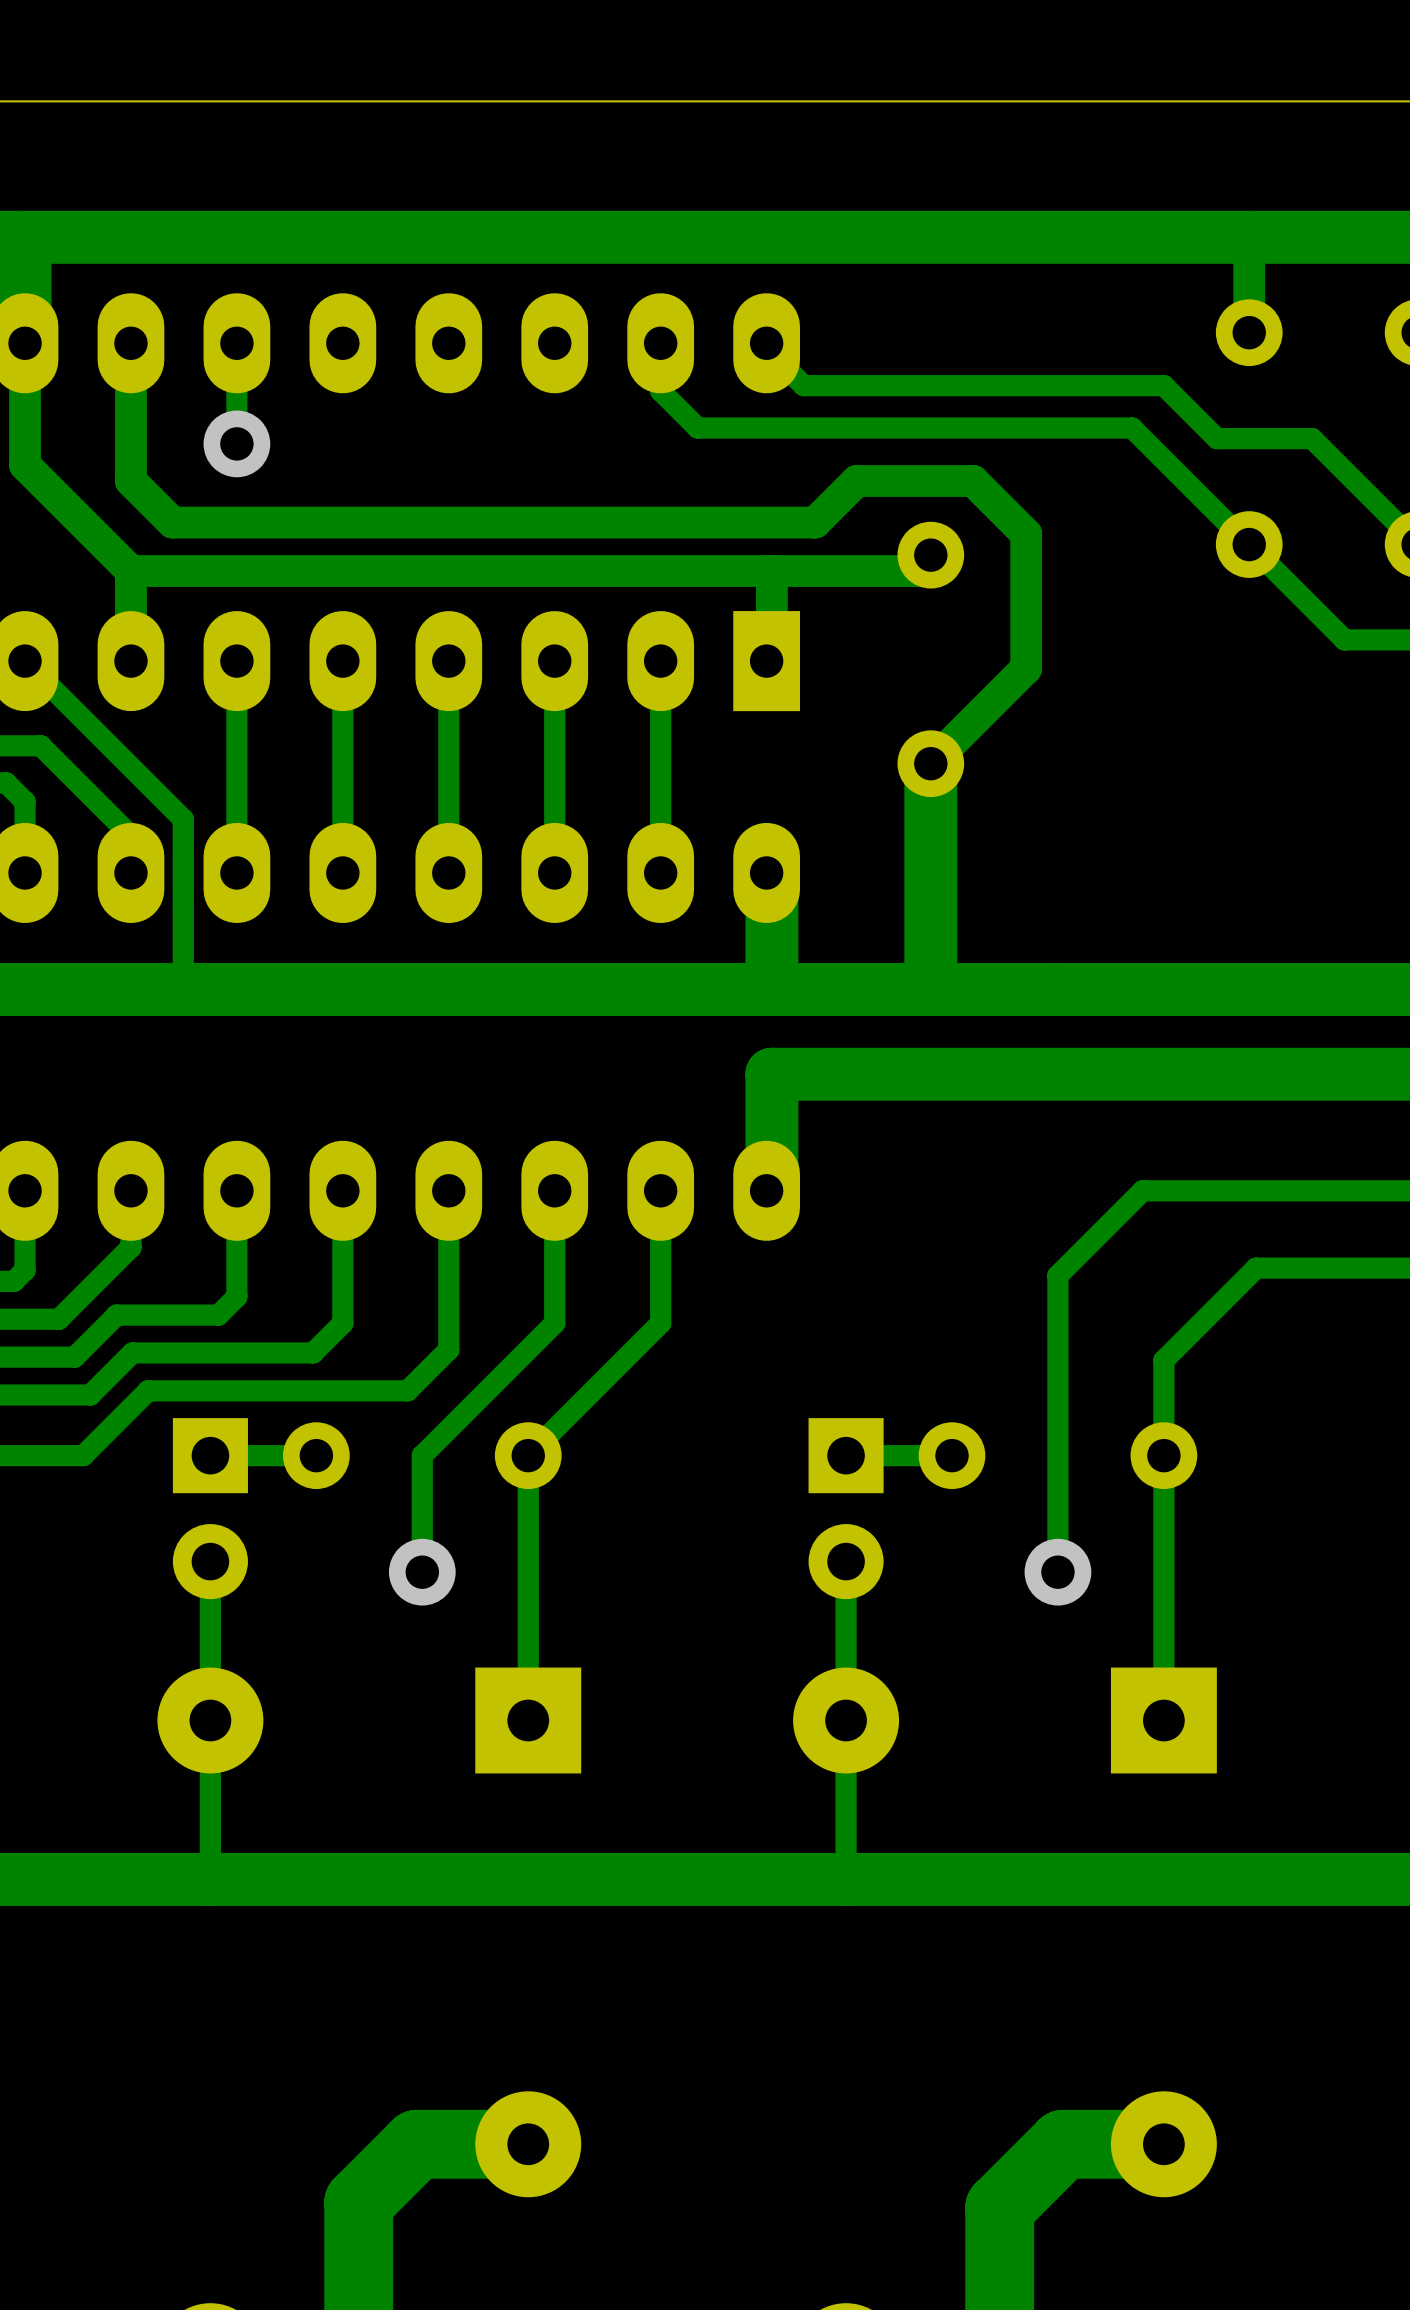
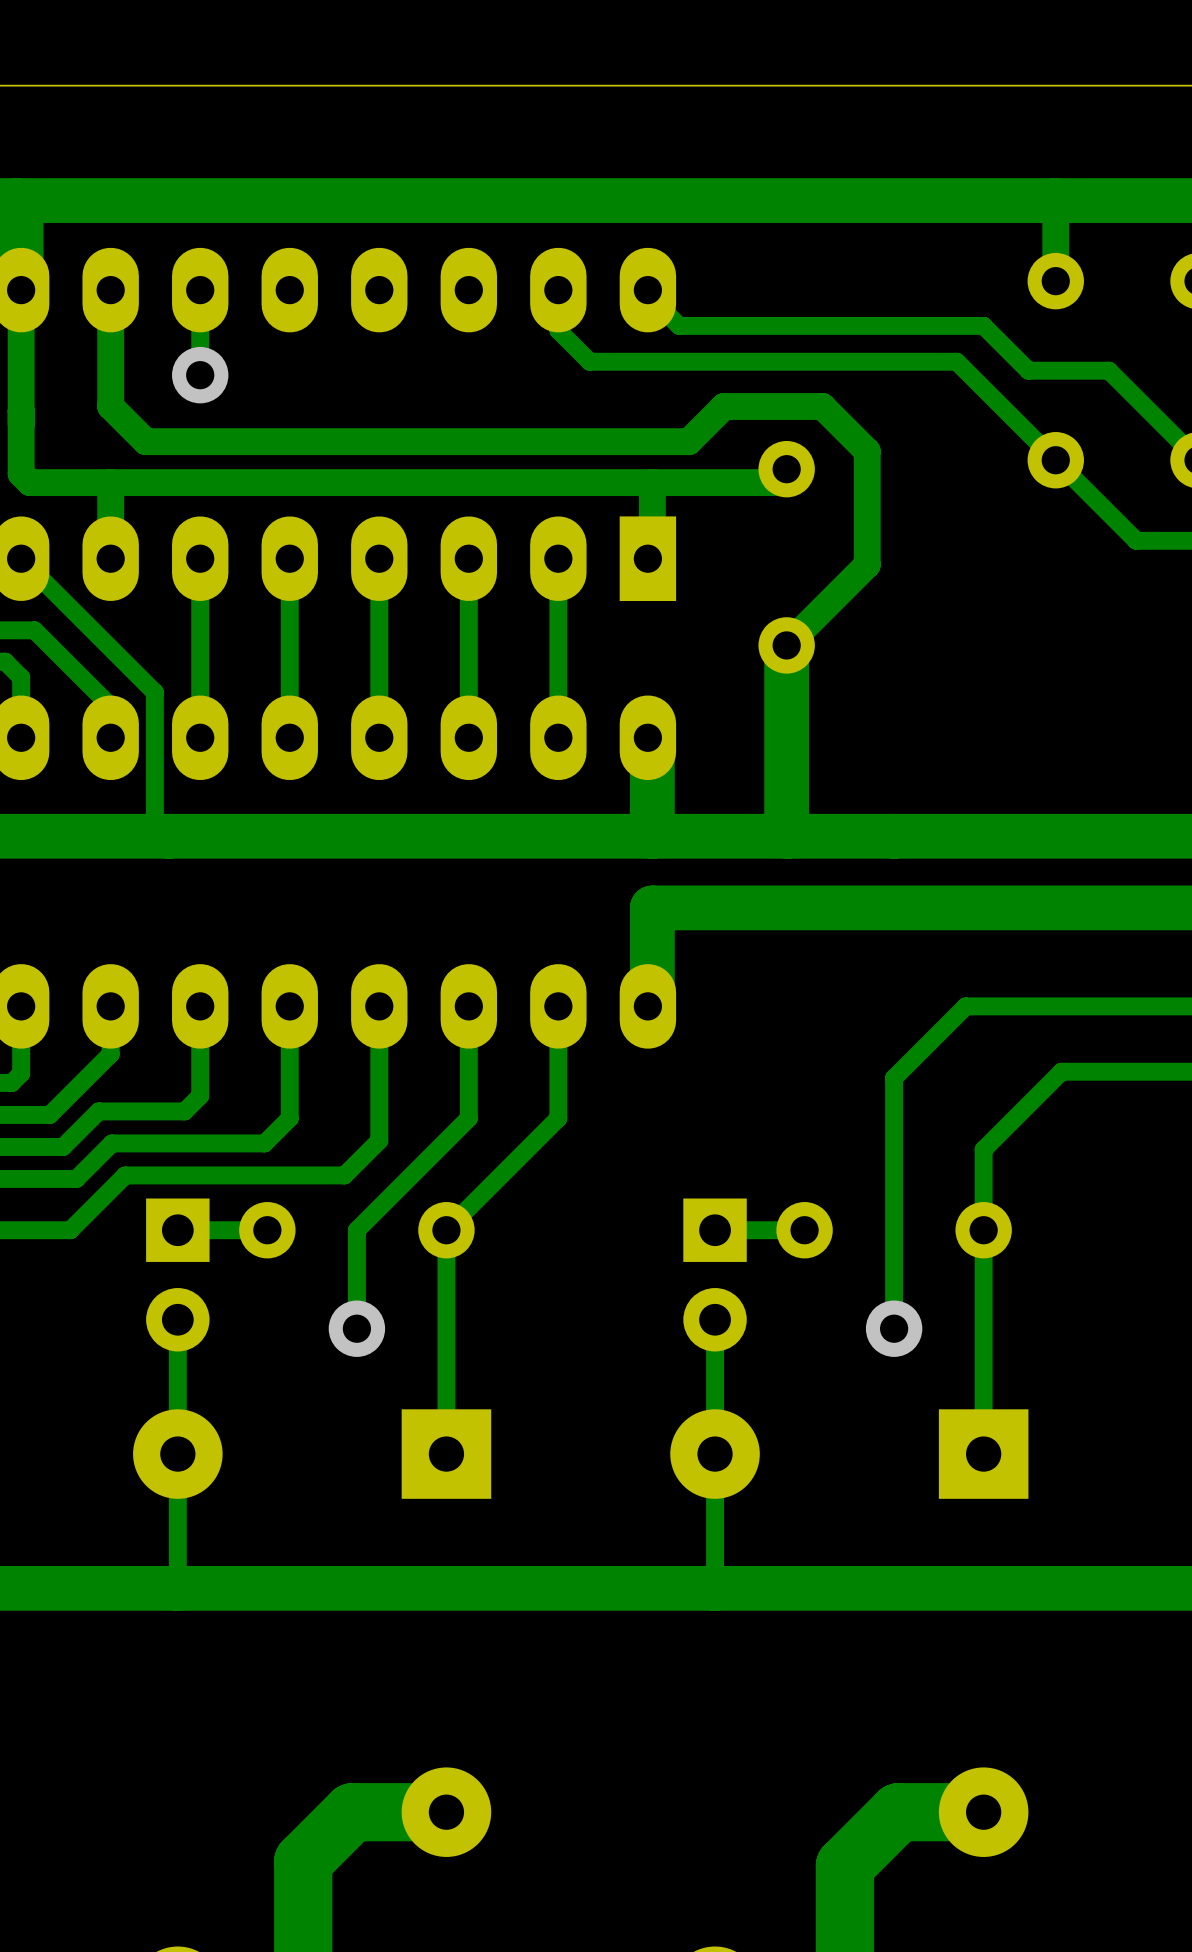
track: (25, 465) (130, 571) -> (21, 393) (21, 473) (30, 482) (110, 482)

